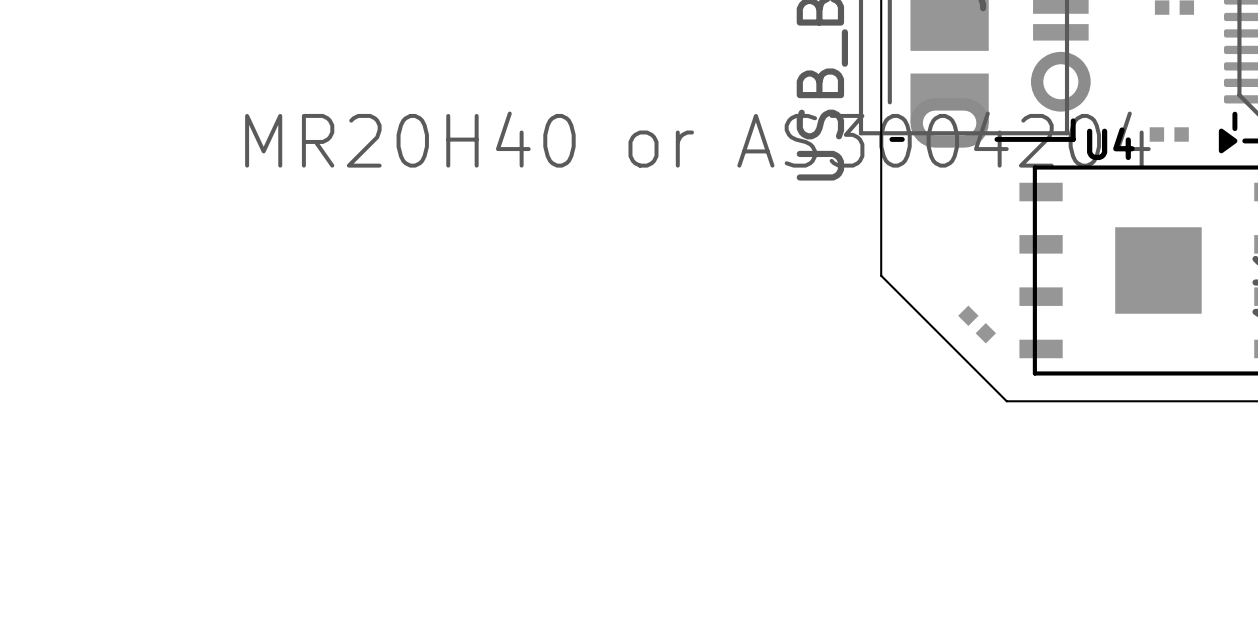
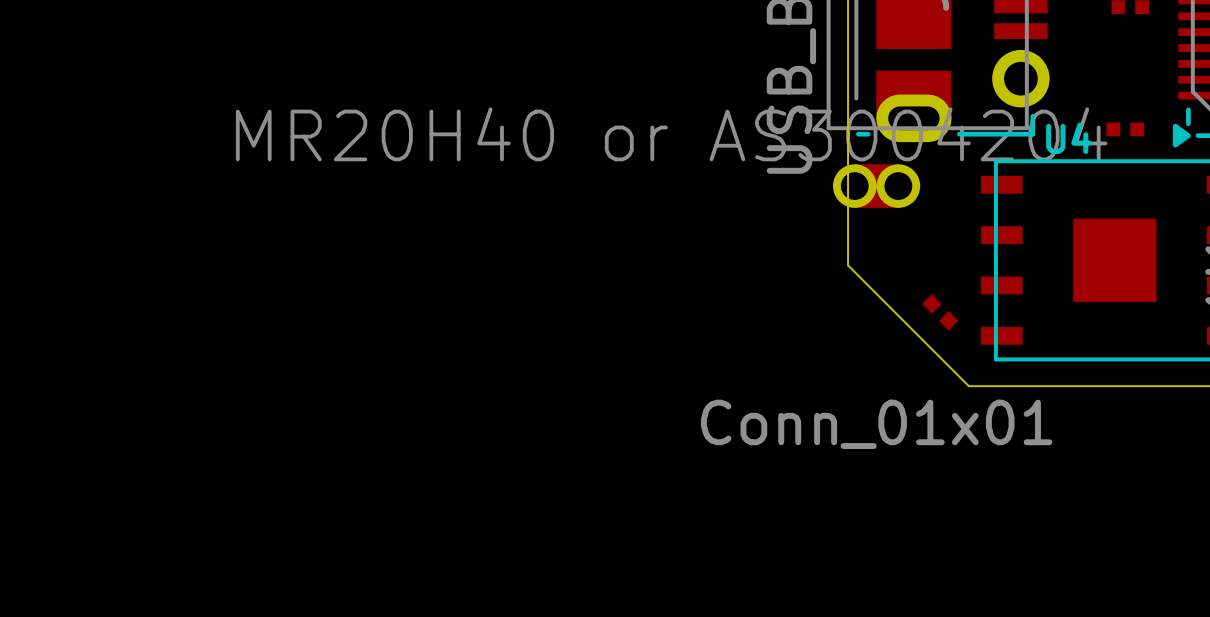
part: none -> Conn_01x01 (876, 186)

